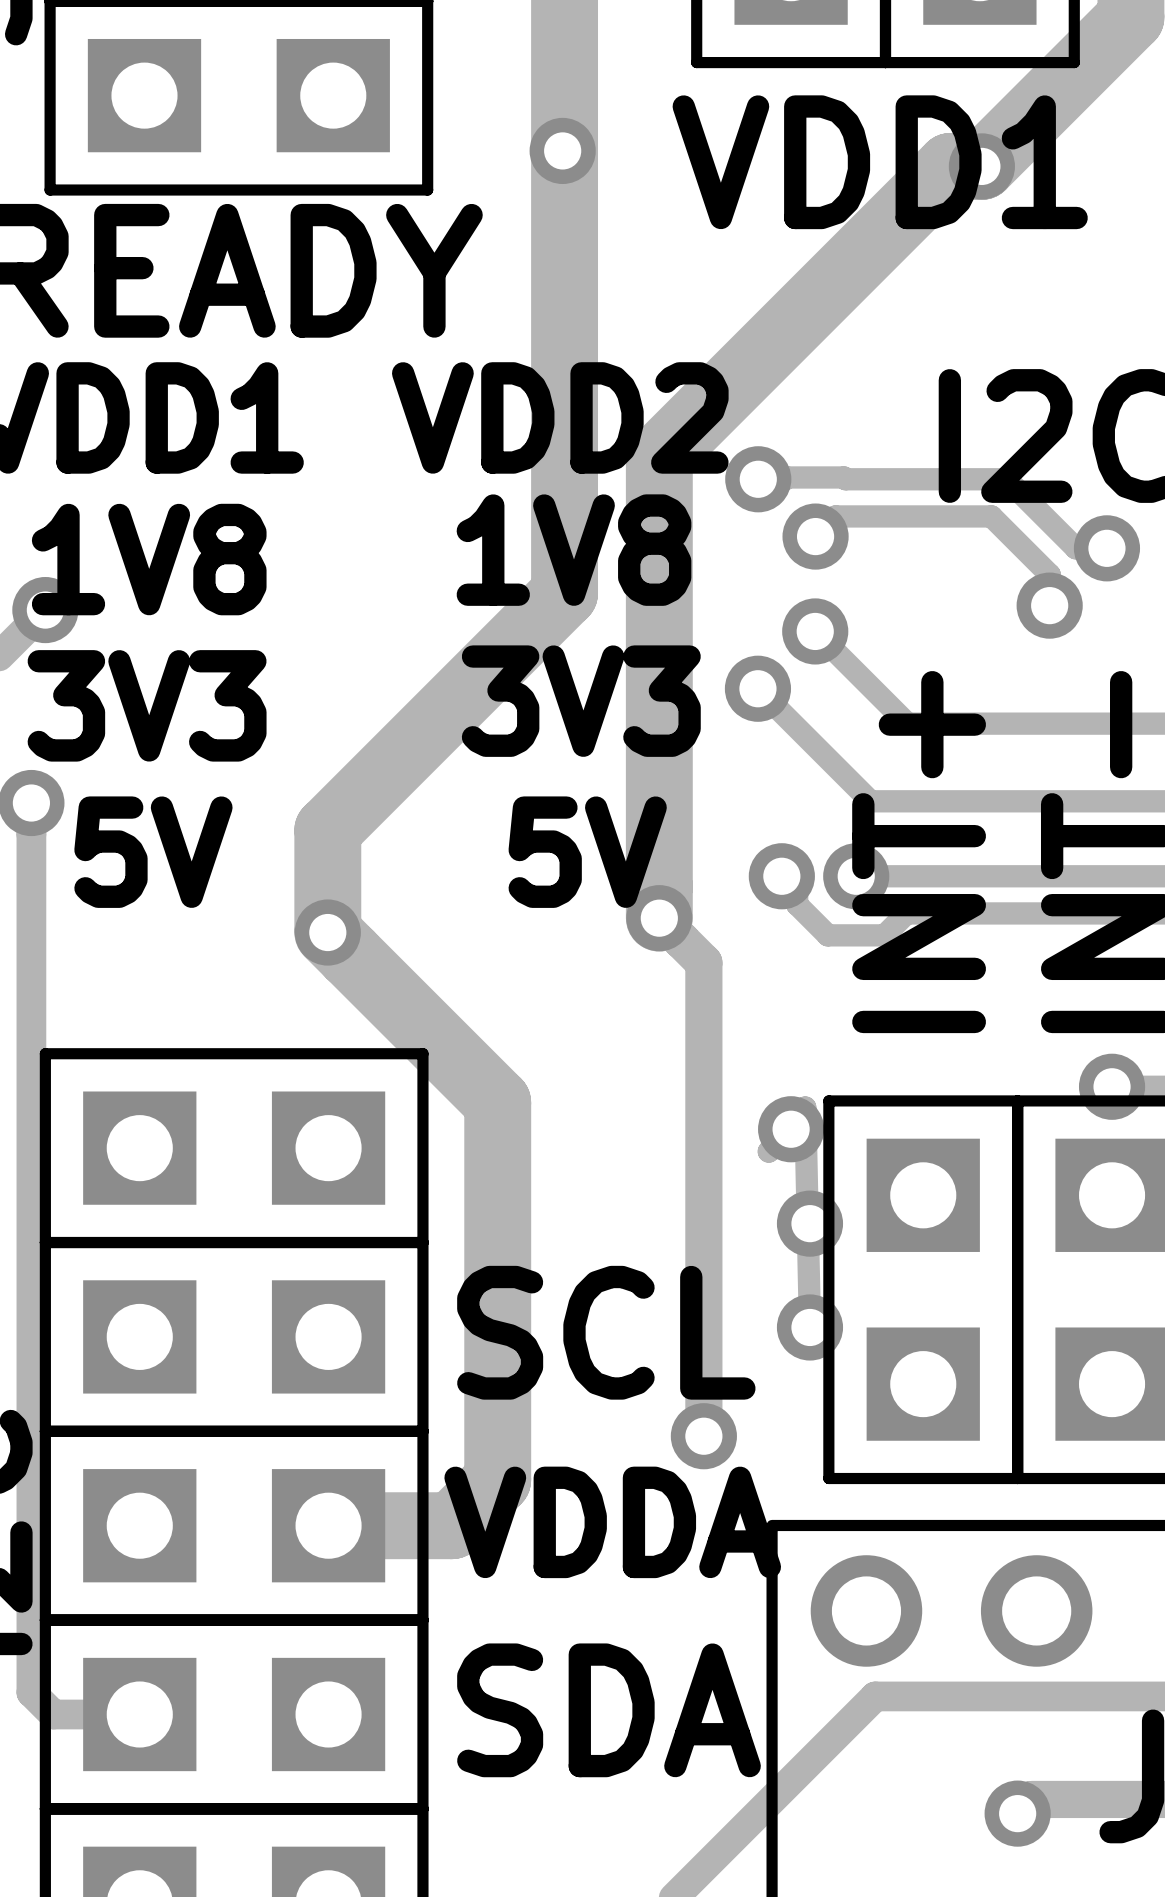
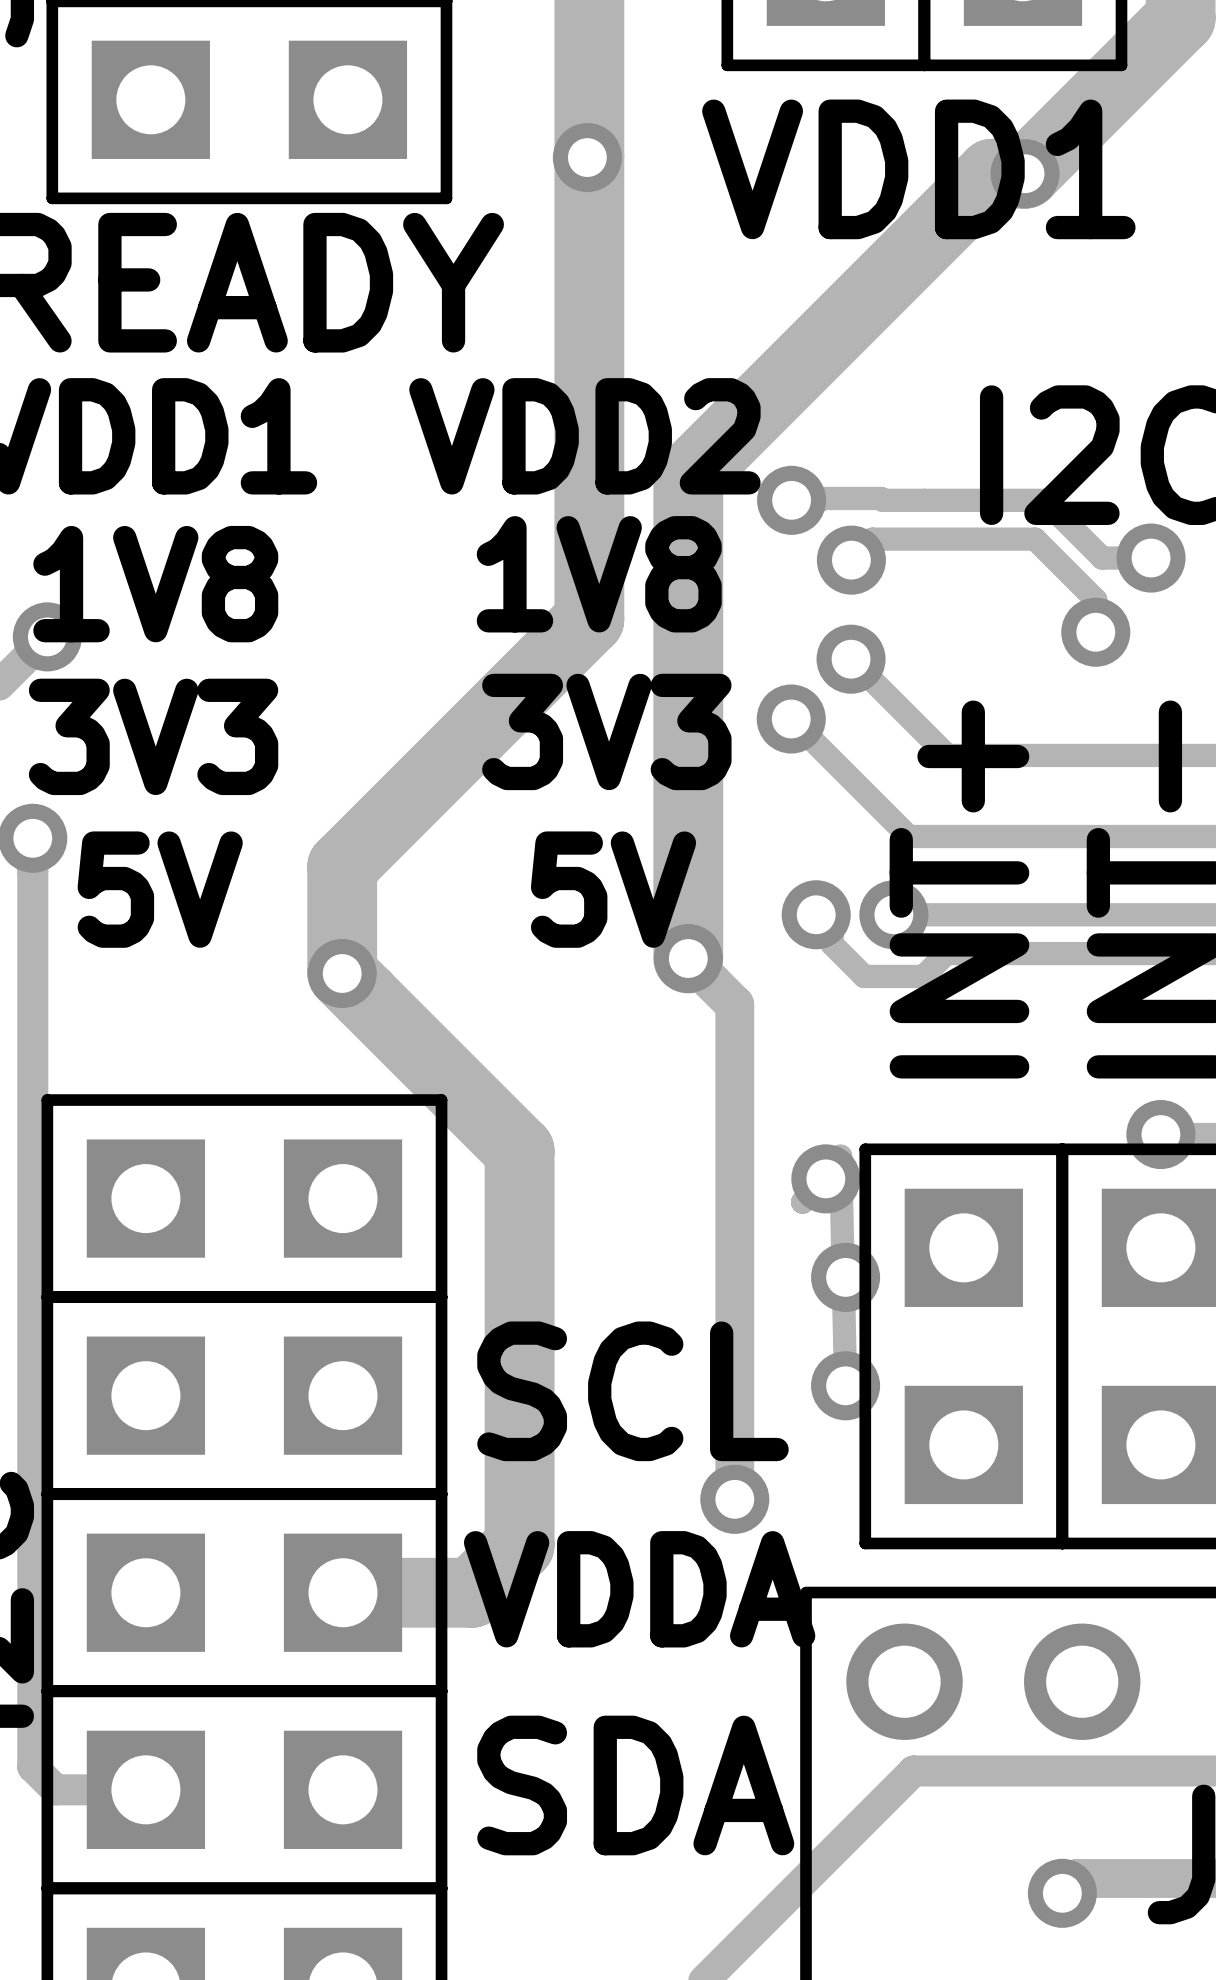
track: (1000, 479) (1006, 479) (1075, 548) (1106, 548) -> (1044, 500) (1102, 558) (1151, 558)
via position: (1106, 548) -> (1151, 558)

